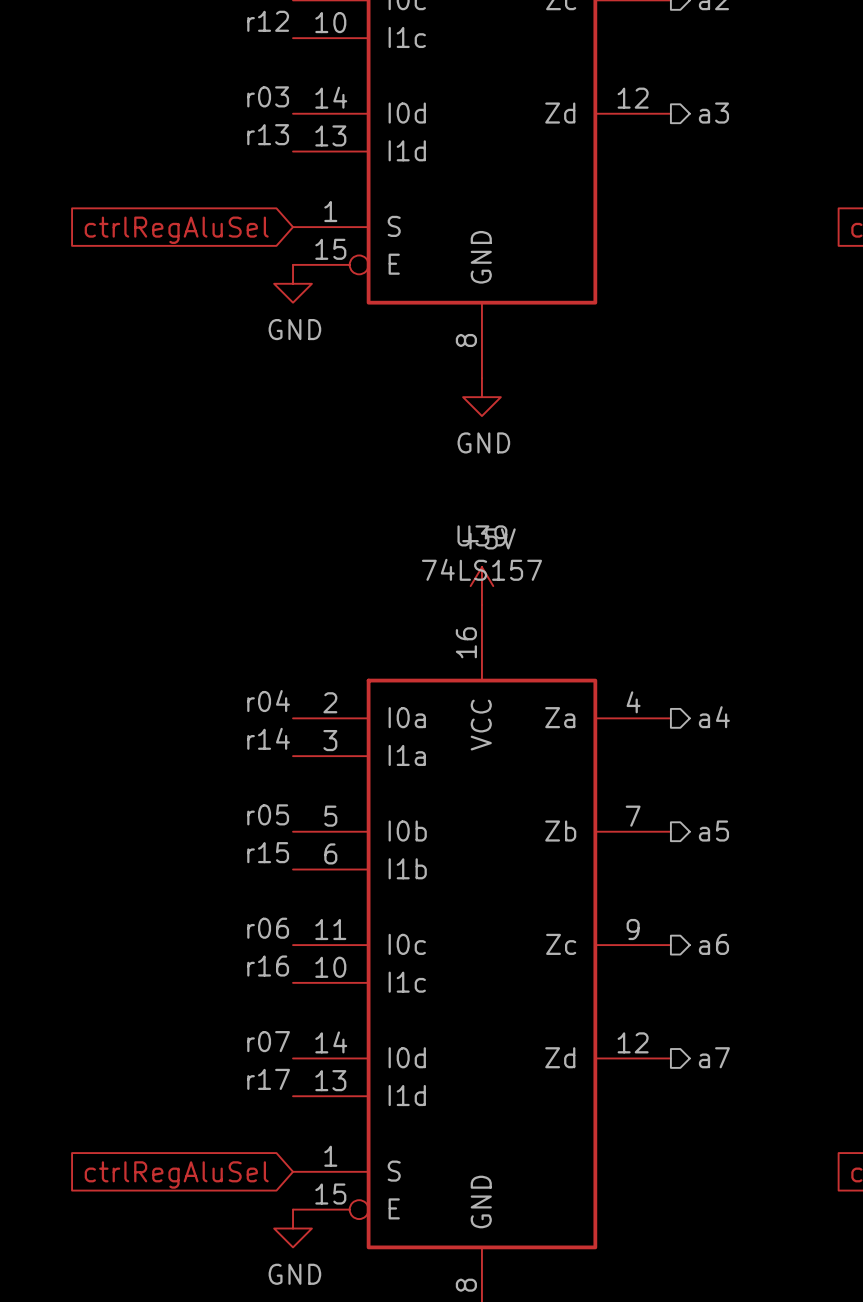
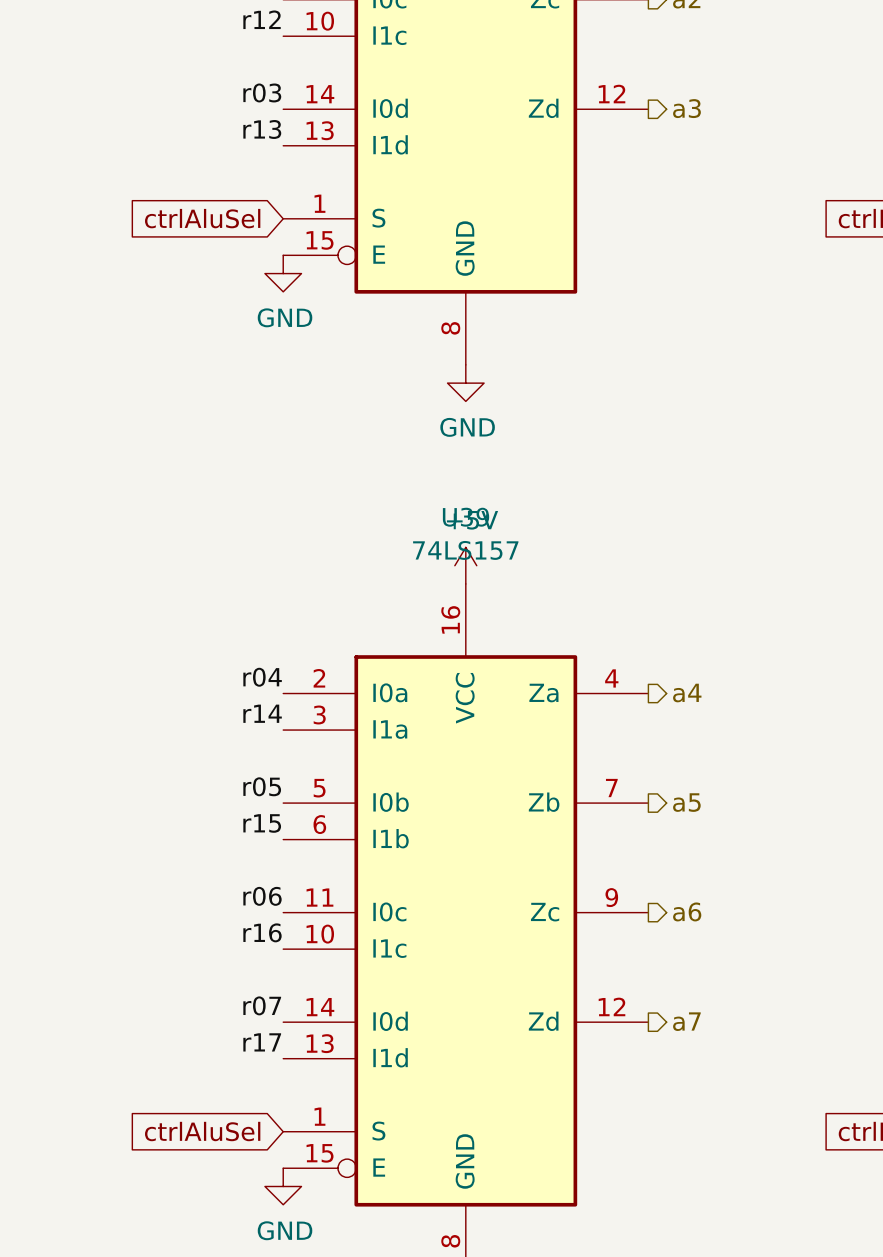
global label: ctrlRegAluSel (176, 230) -> ctrlAluSel (202, 218)
global label: ctrlRegAluSel (176, 1174) -> ctrlAluSel (202, 1131)

